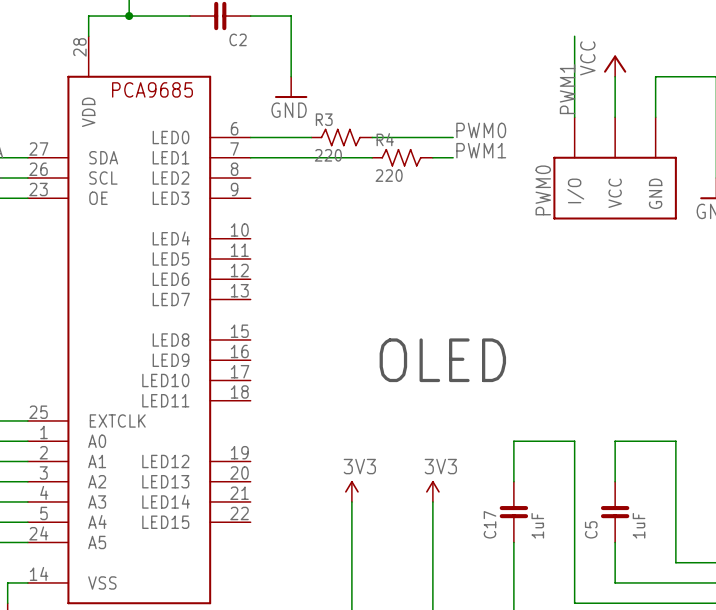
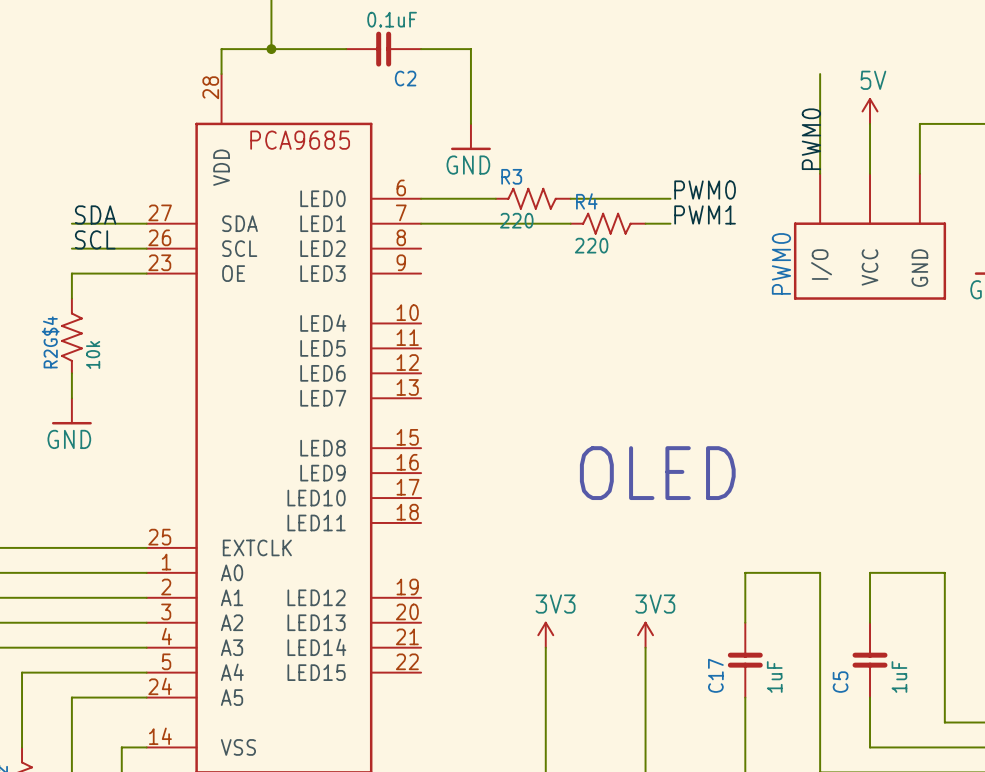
power symbol: VCC (615, 66) -> 5V (870, 110)
label: PWM1 (567, 89) -> PWM0 (811, 139)

